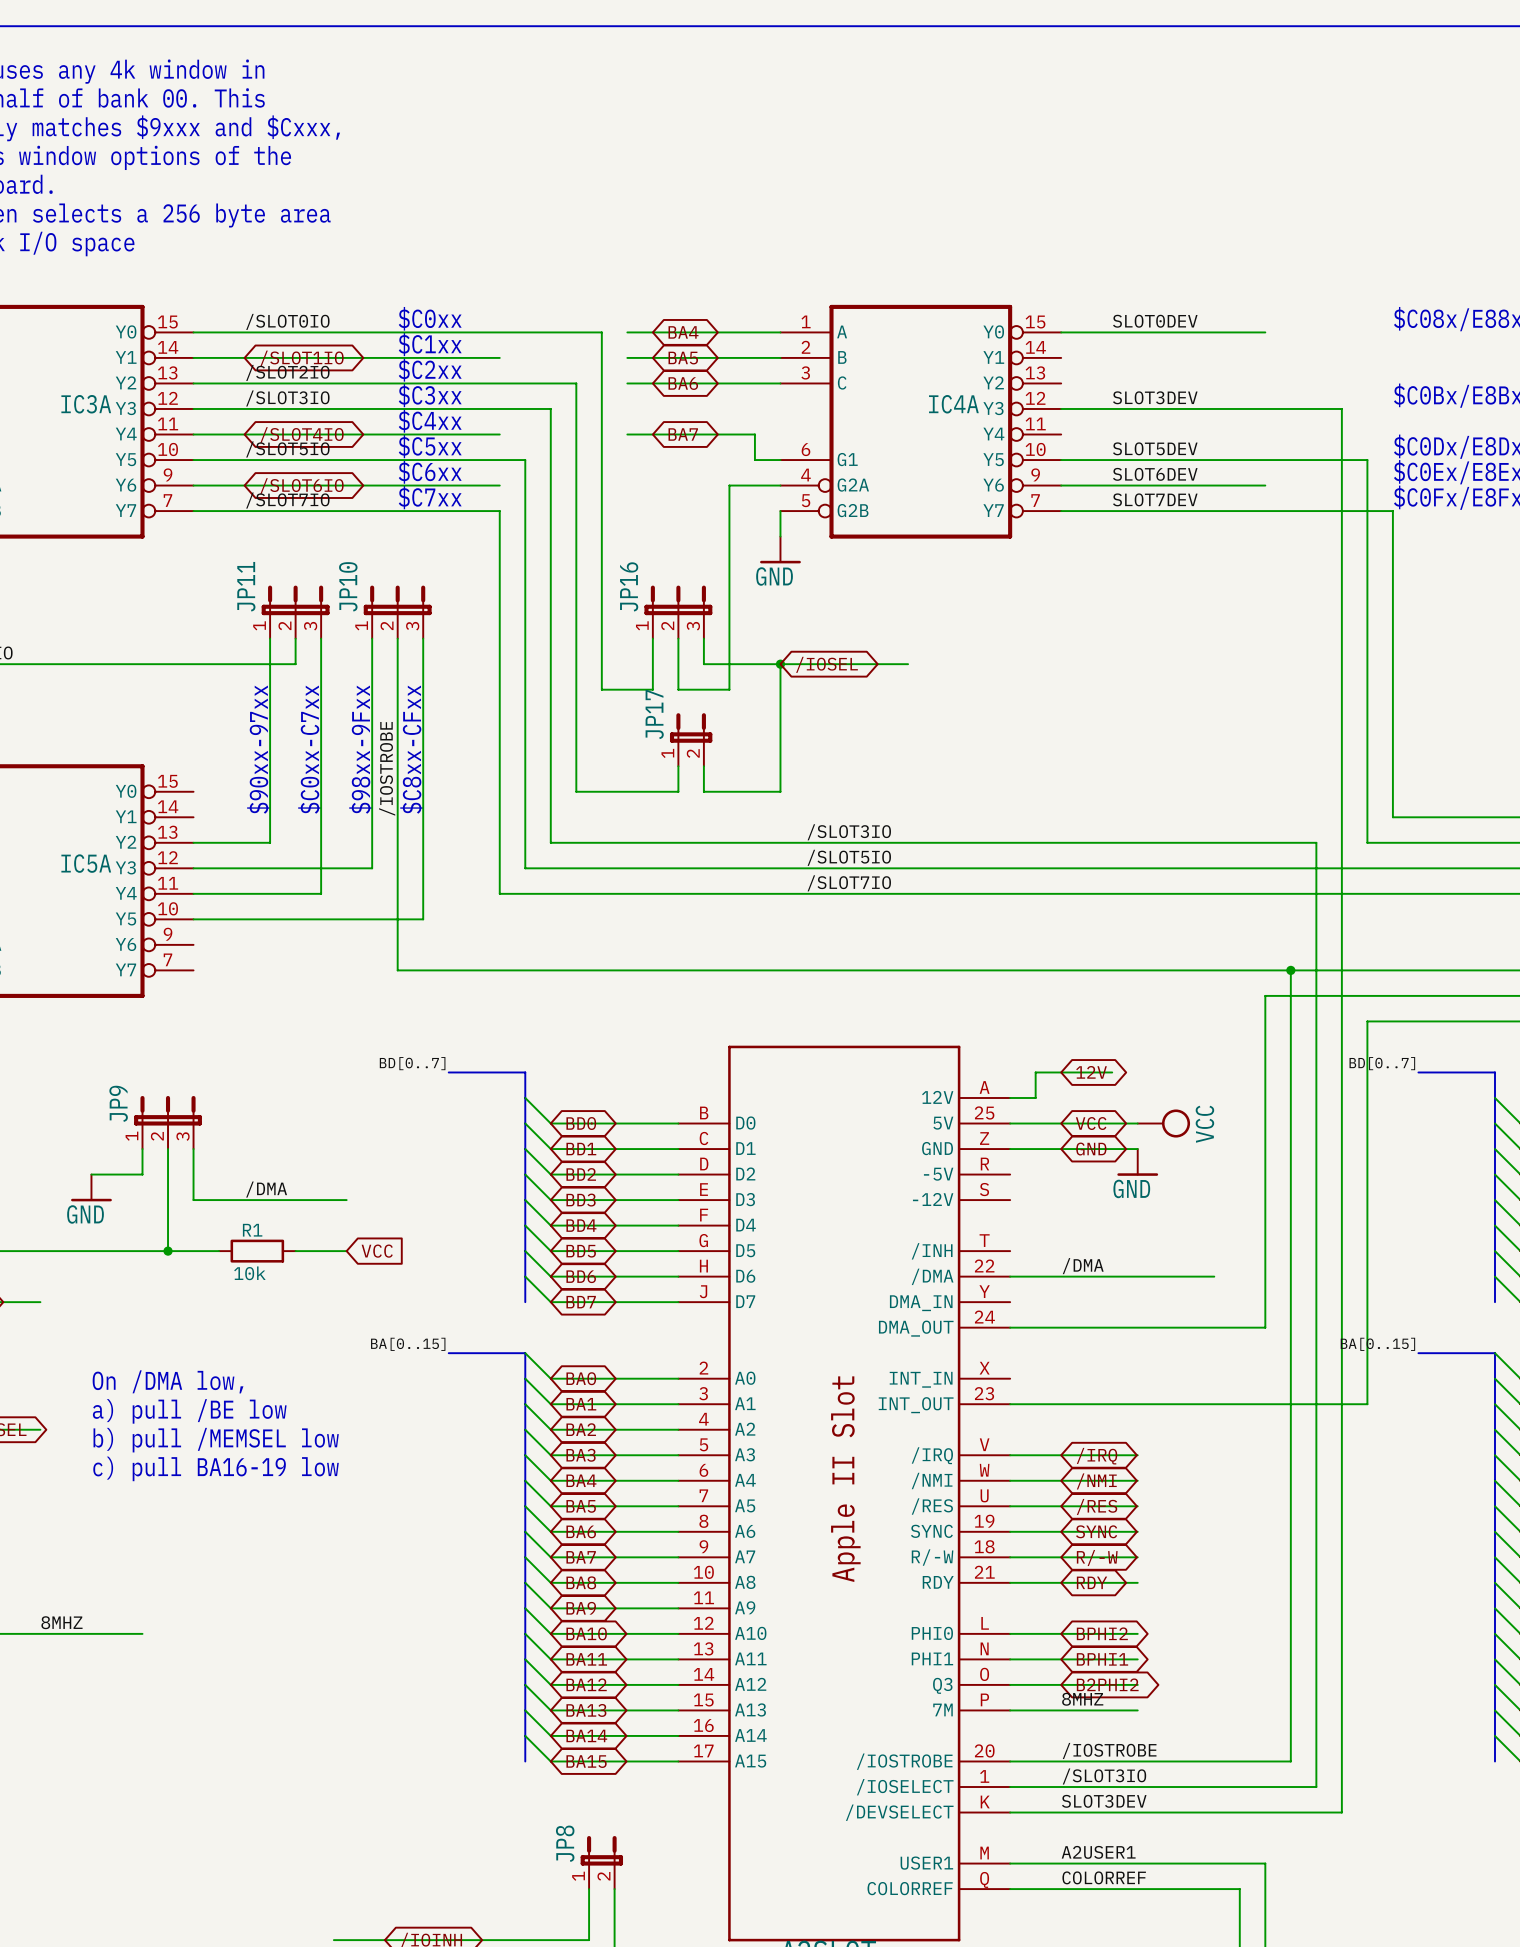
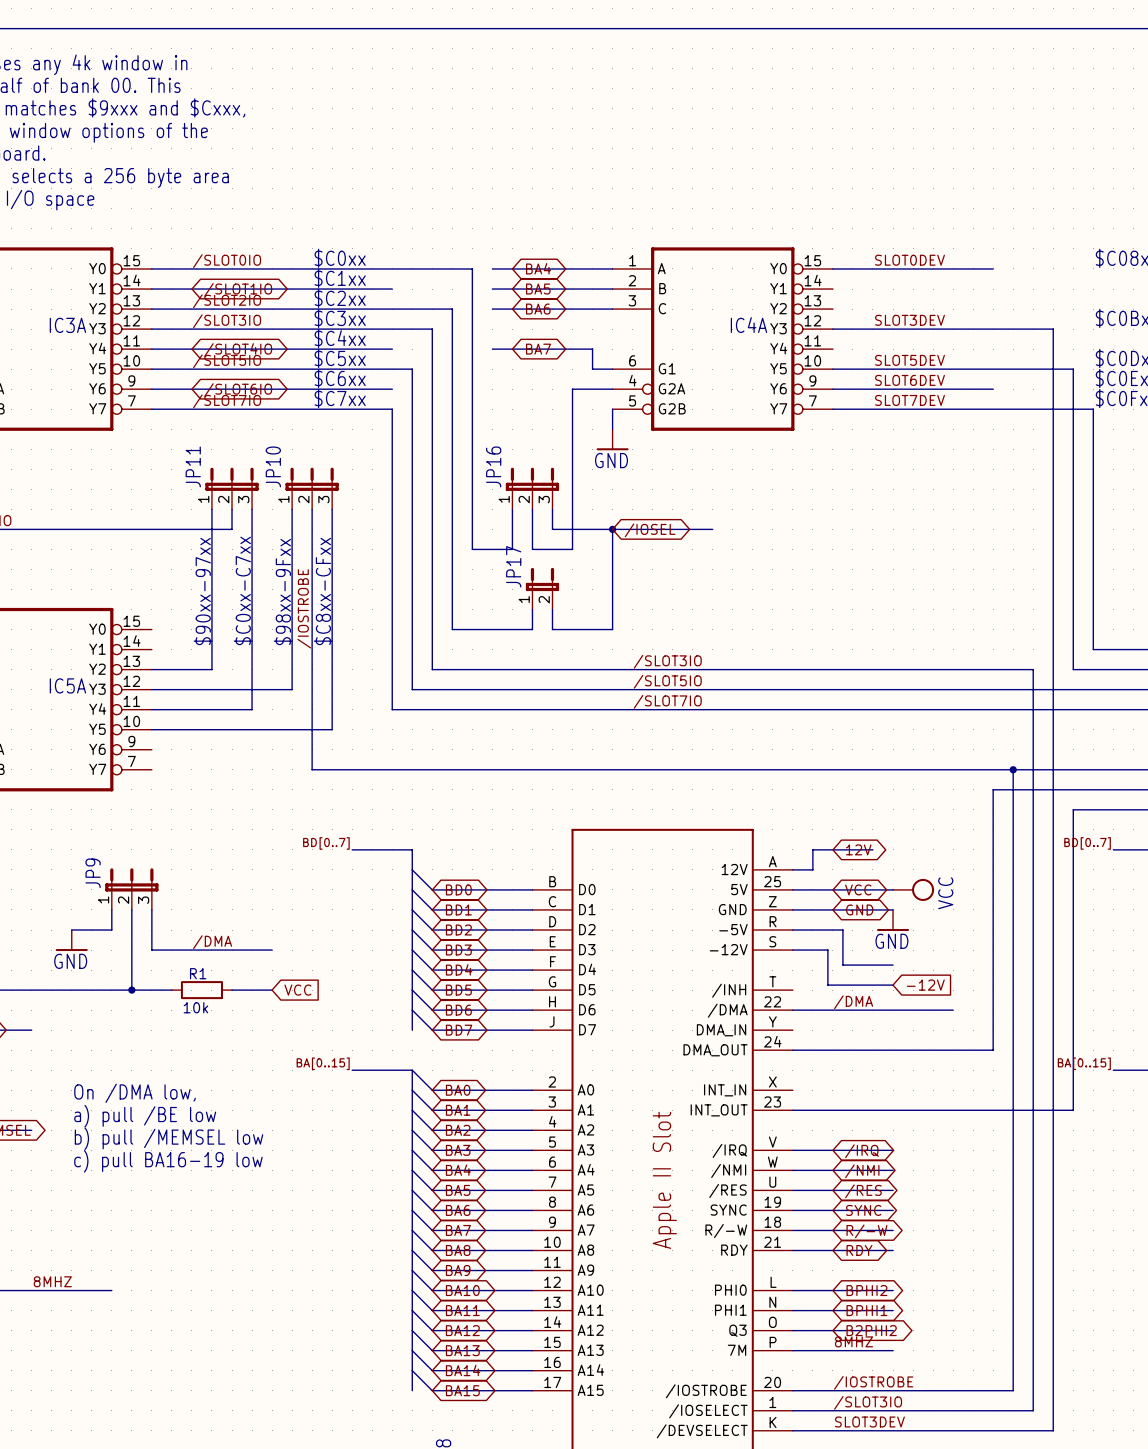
wire: none -> (792, 930) (842, 930) (842, 965) (893, 965)
wire: none -> (792, 950) (827, 950) (827, 985) (893, 985)
global label: none -> -12V (925, 985)

